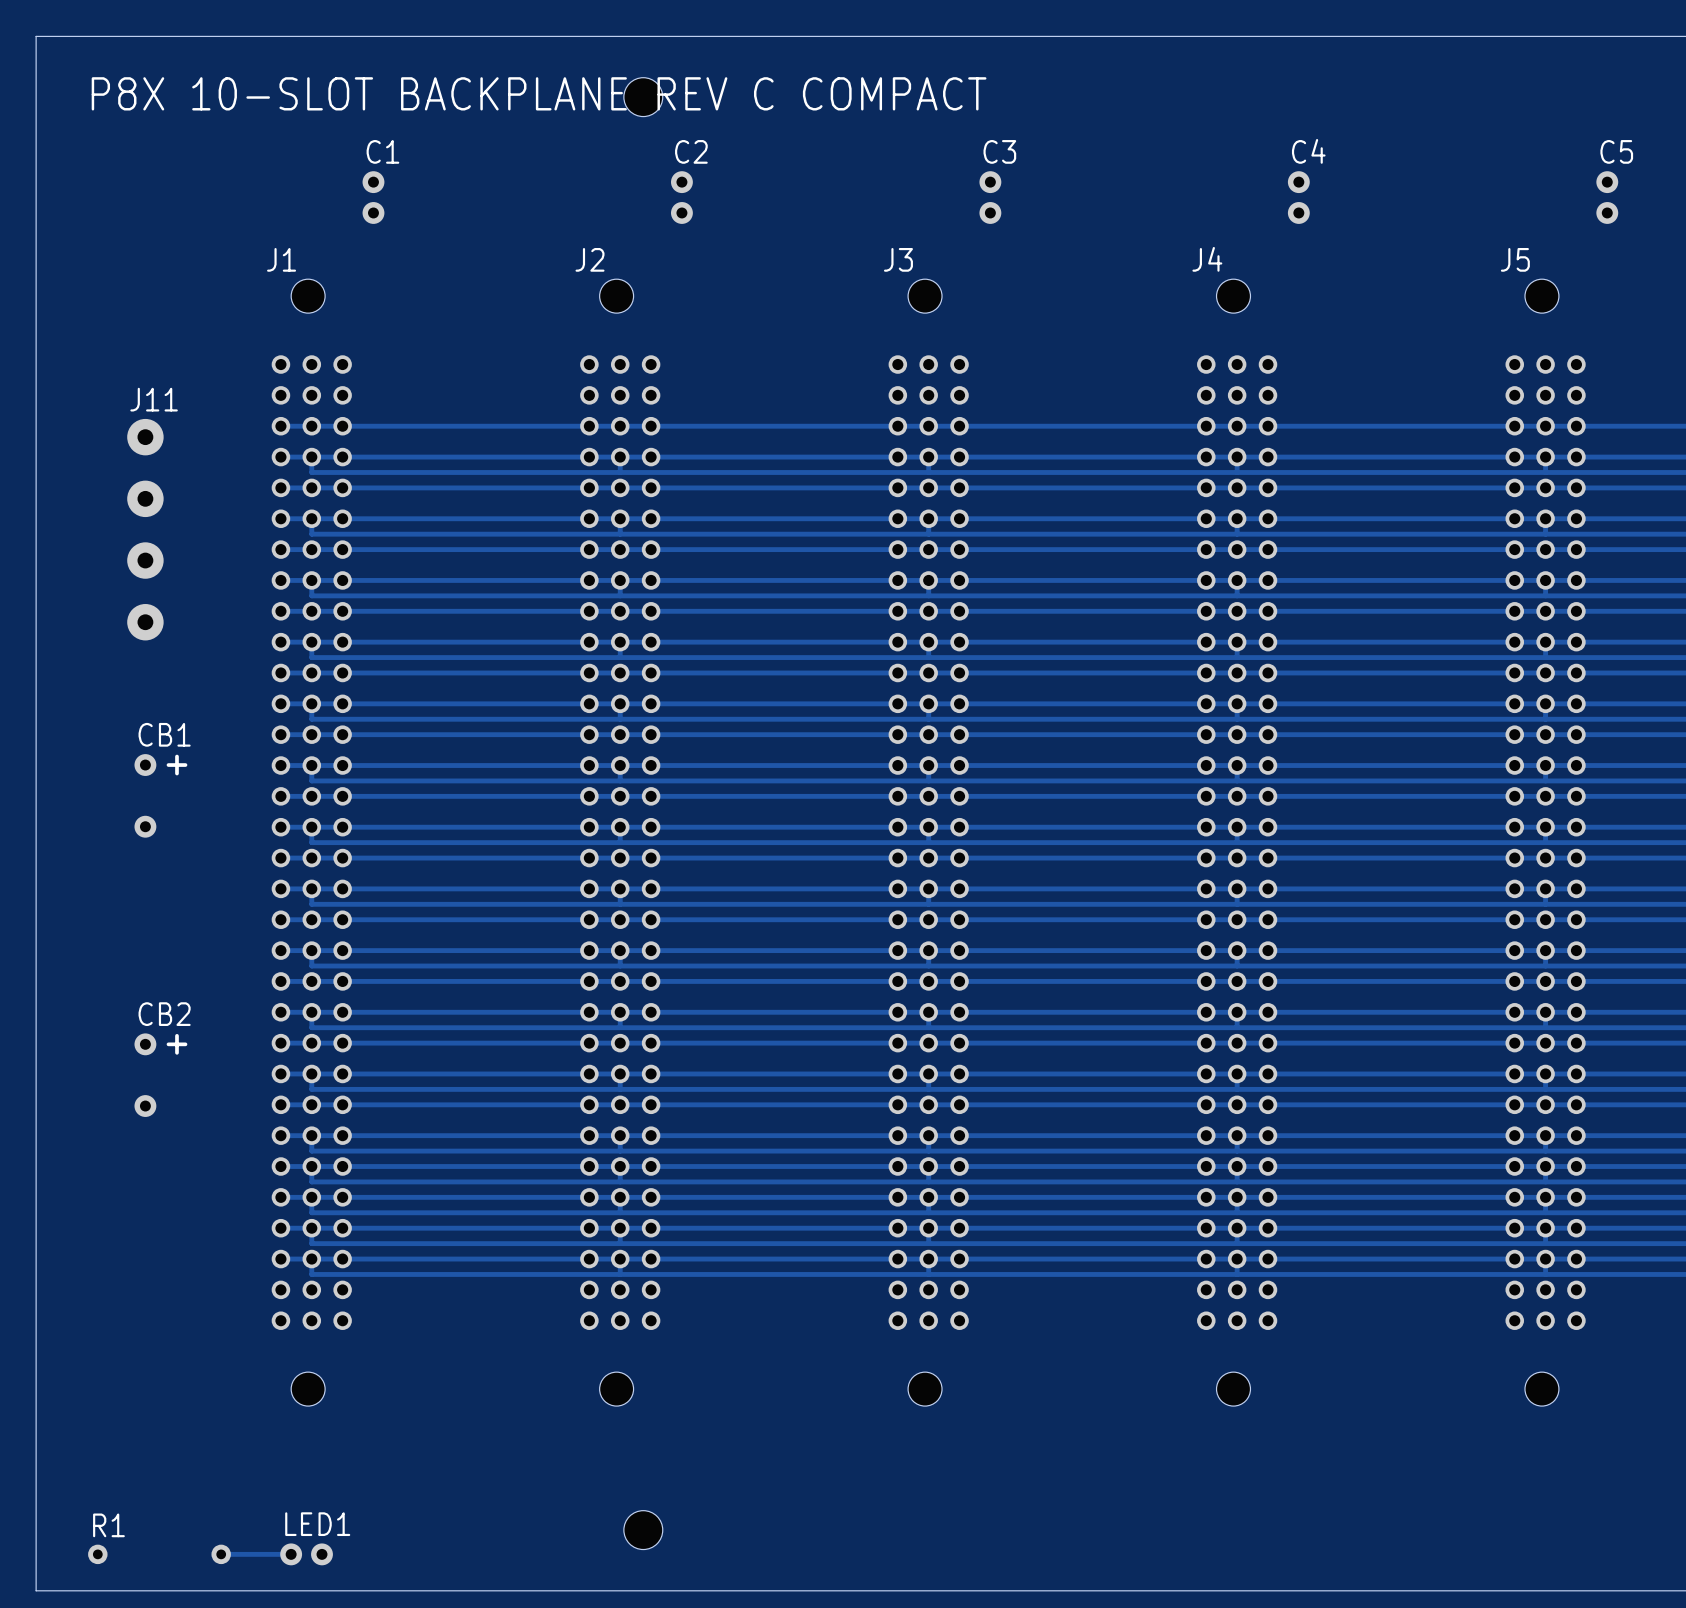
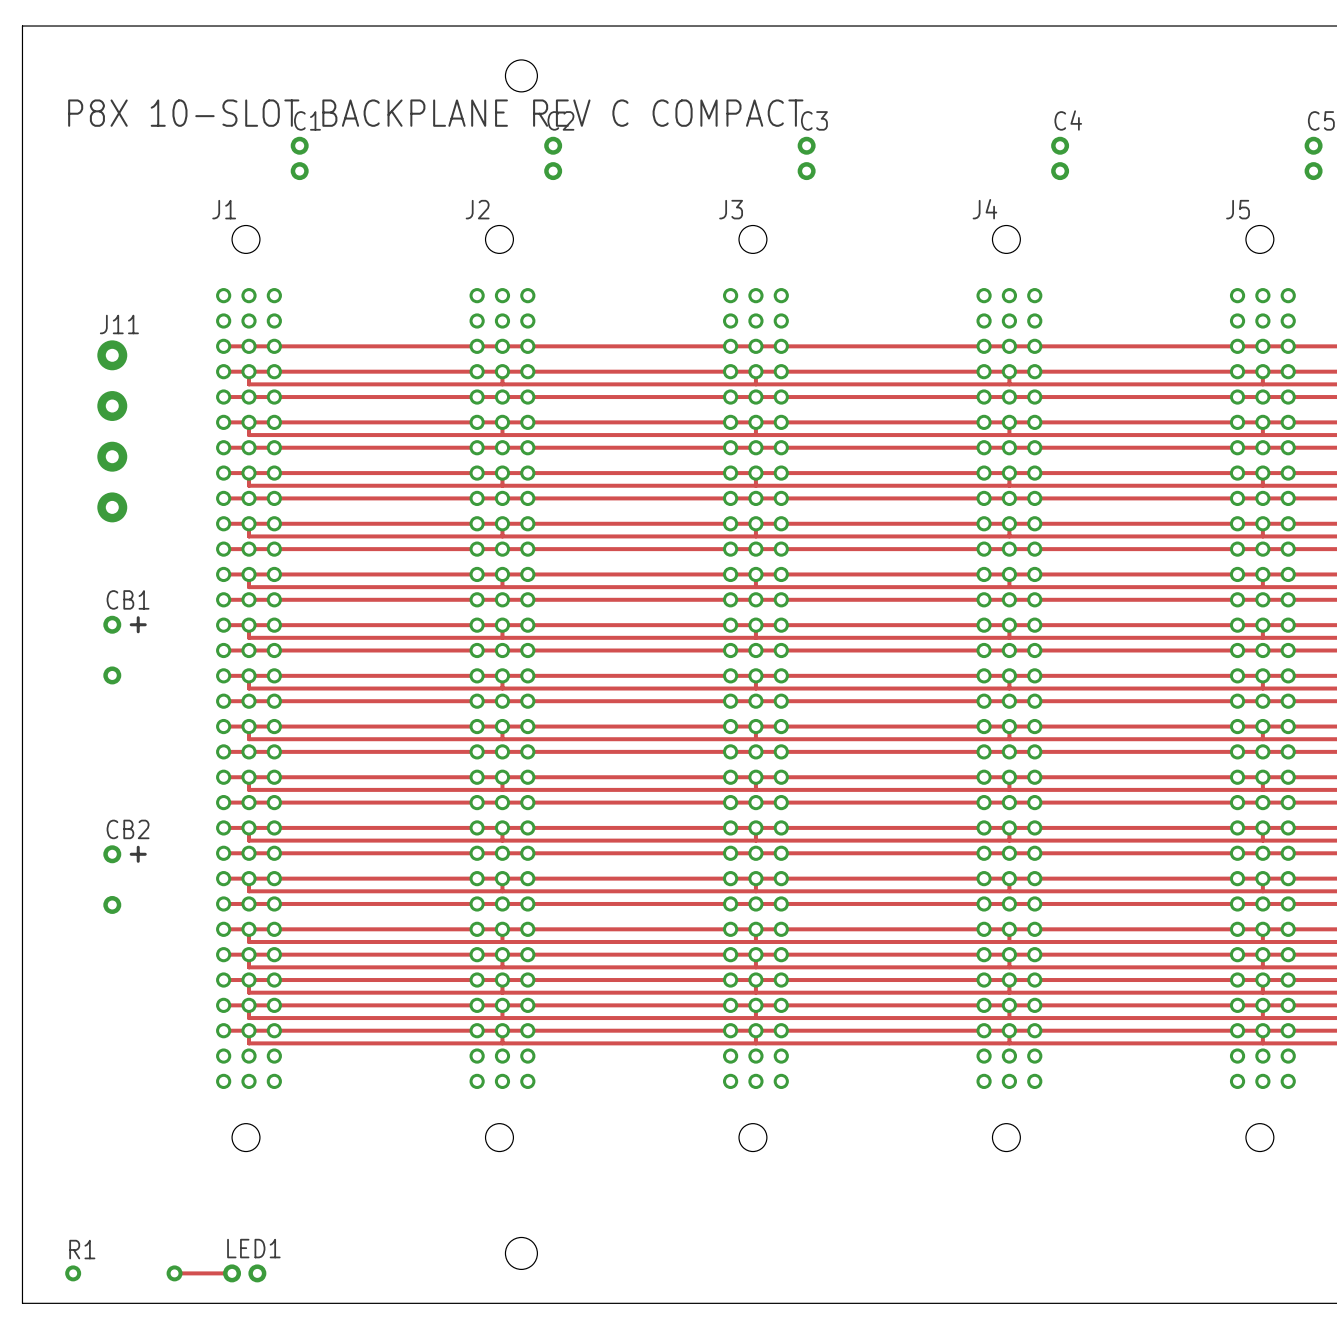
text position: P8X 10-SLOT BACKPLANE REV C COMPACT (539, 93) -> P8X 10-SLOT BACKPLANE REV C COMPACT (435, 113)

